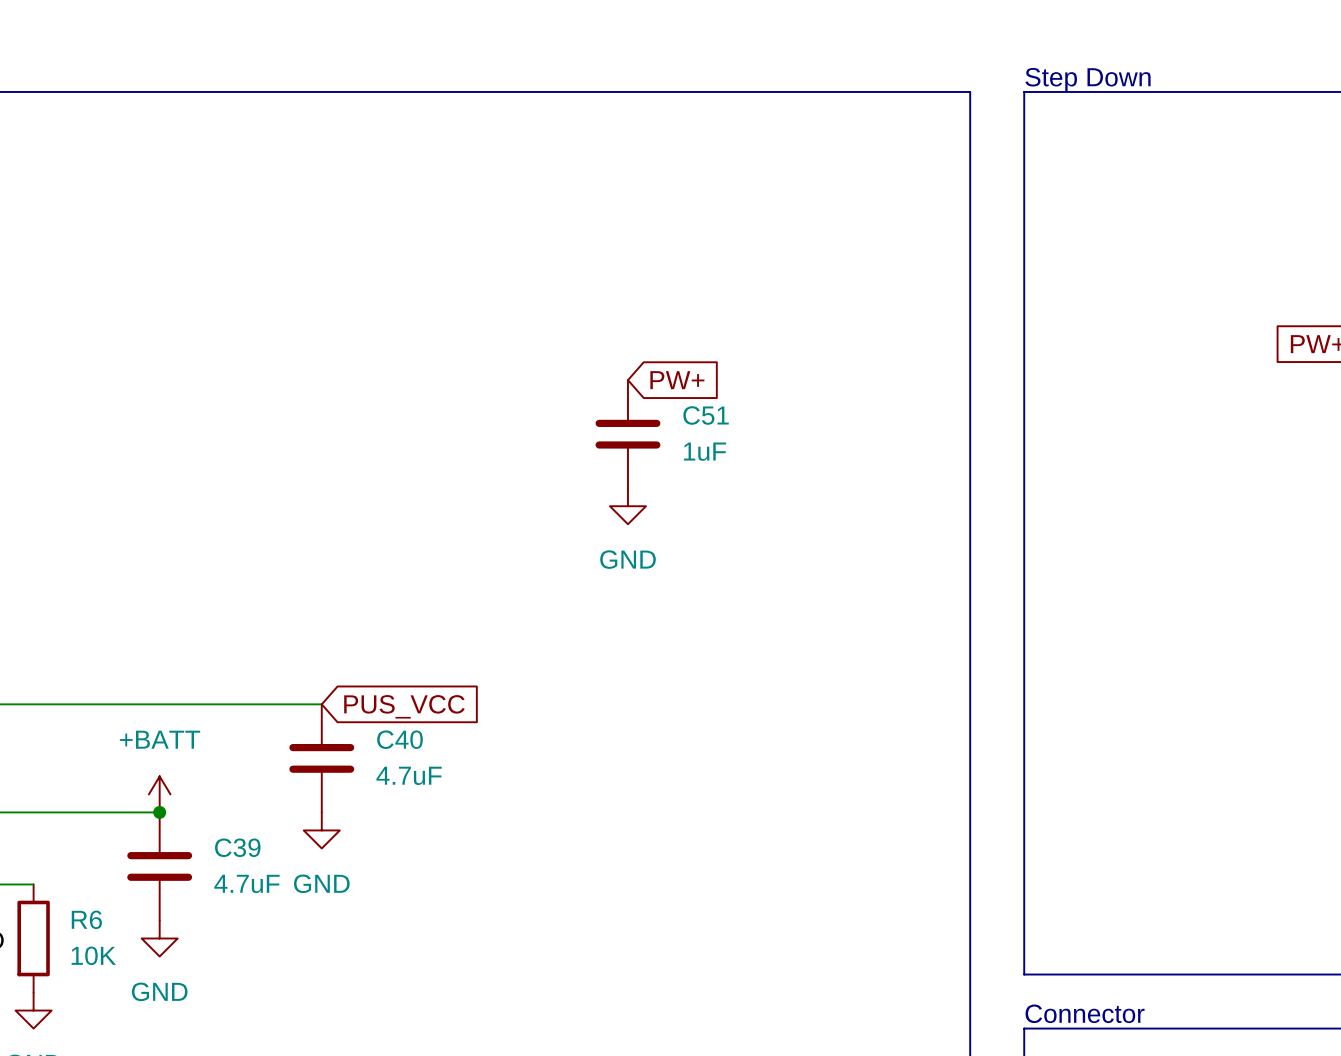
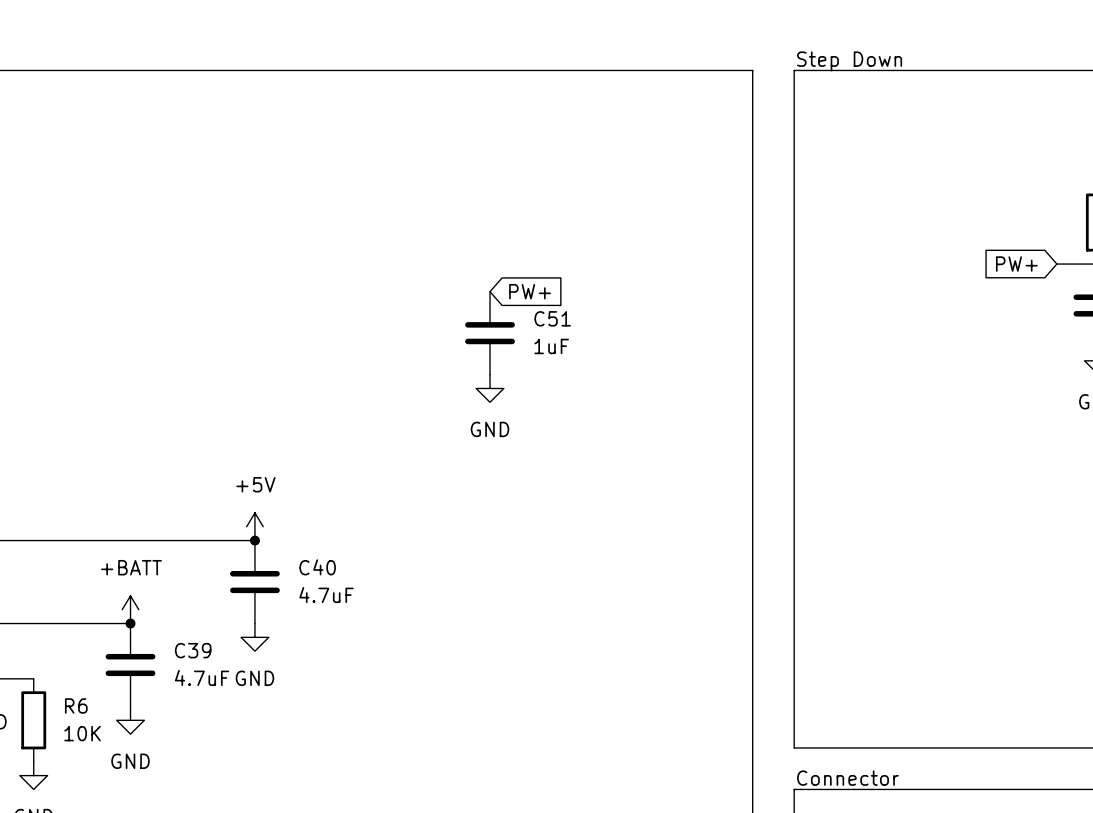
power symbol: none -> +5V (254, 526)
junction: none -> (254, 540)
global label: PUS_VCC (404, 706) -> none

